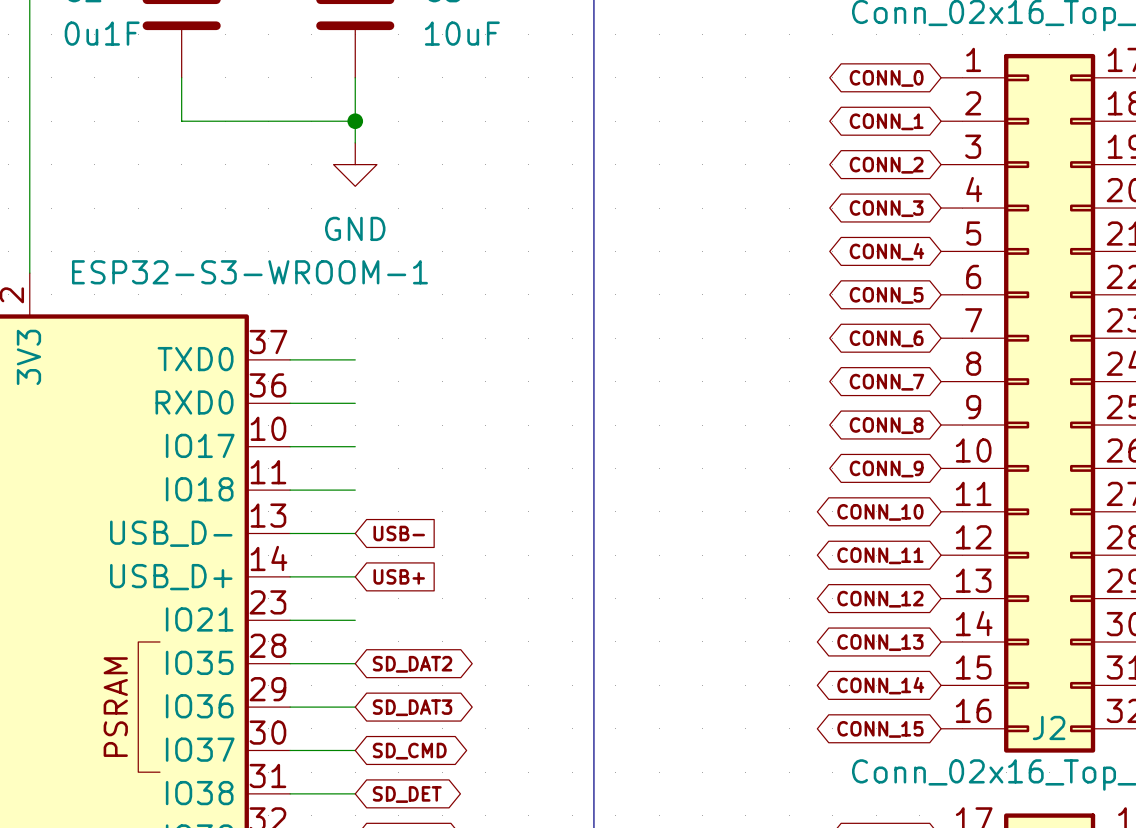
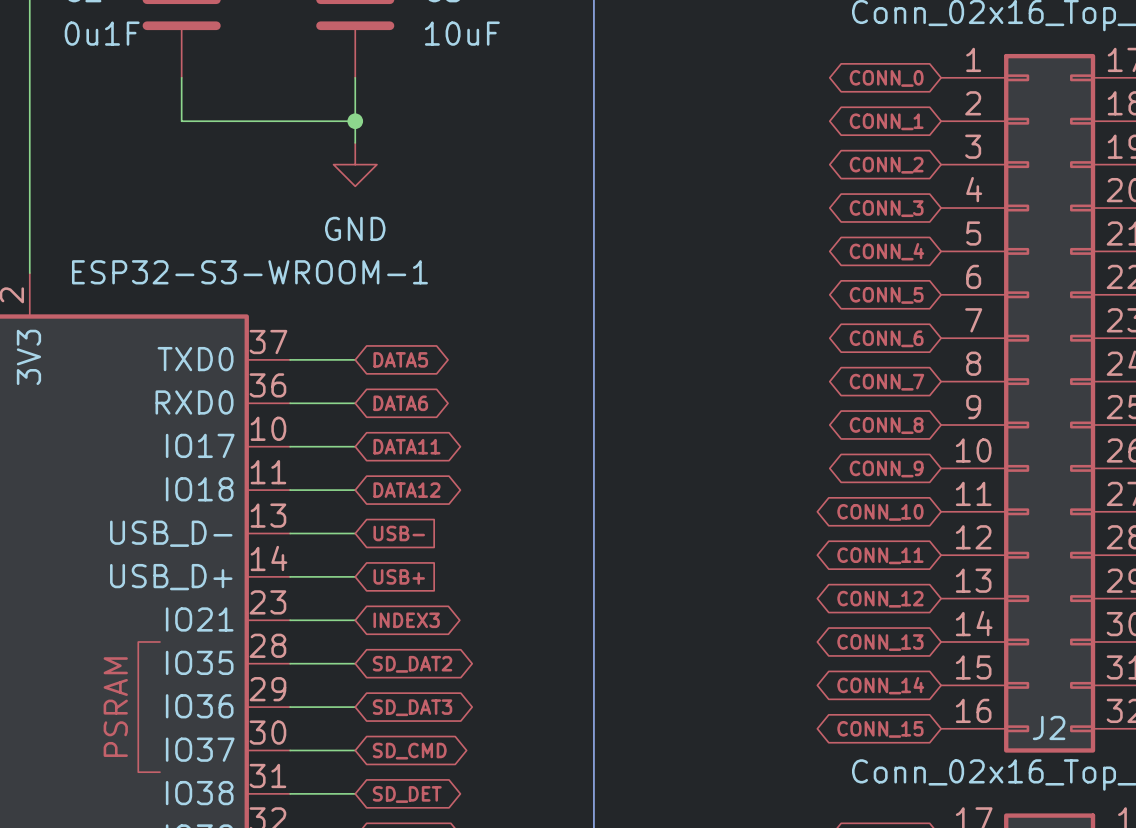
global label: none -> DATA5 (400, 359)
global label: none -> DATA6 (400, 403)
global label: none -> DATA11 (406, 446)
global label: none -> DATA12 (406, 490)
global label: none -> INDEX3 (406, 620)

